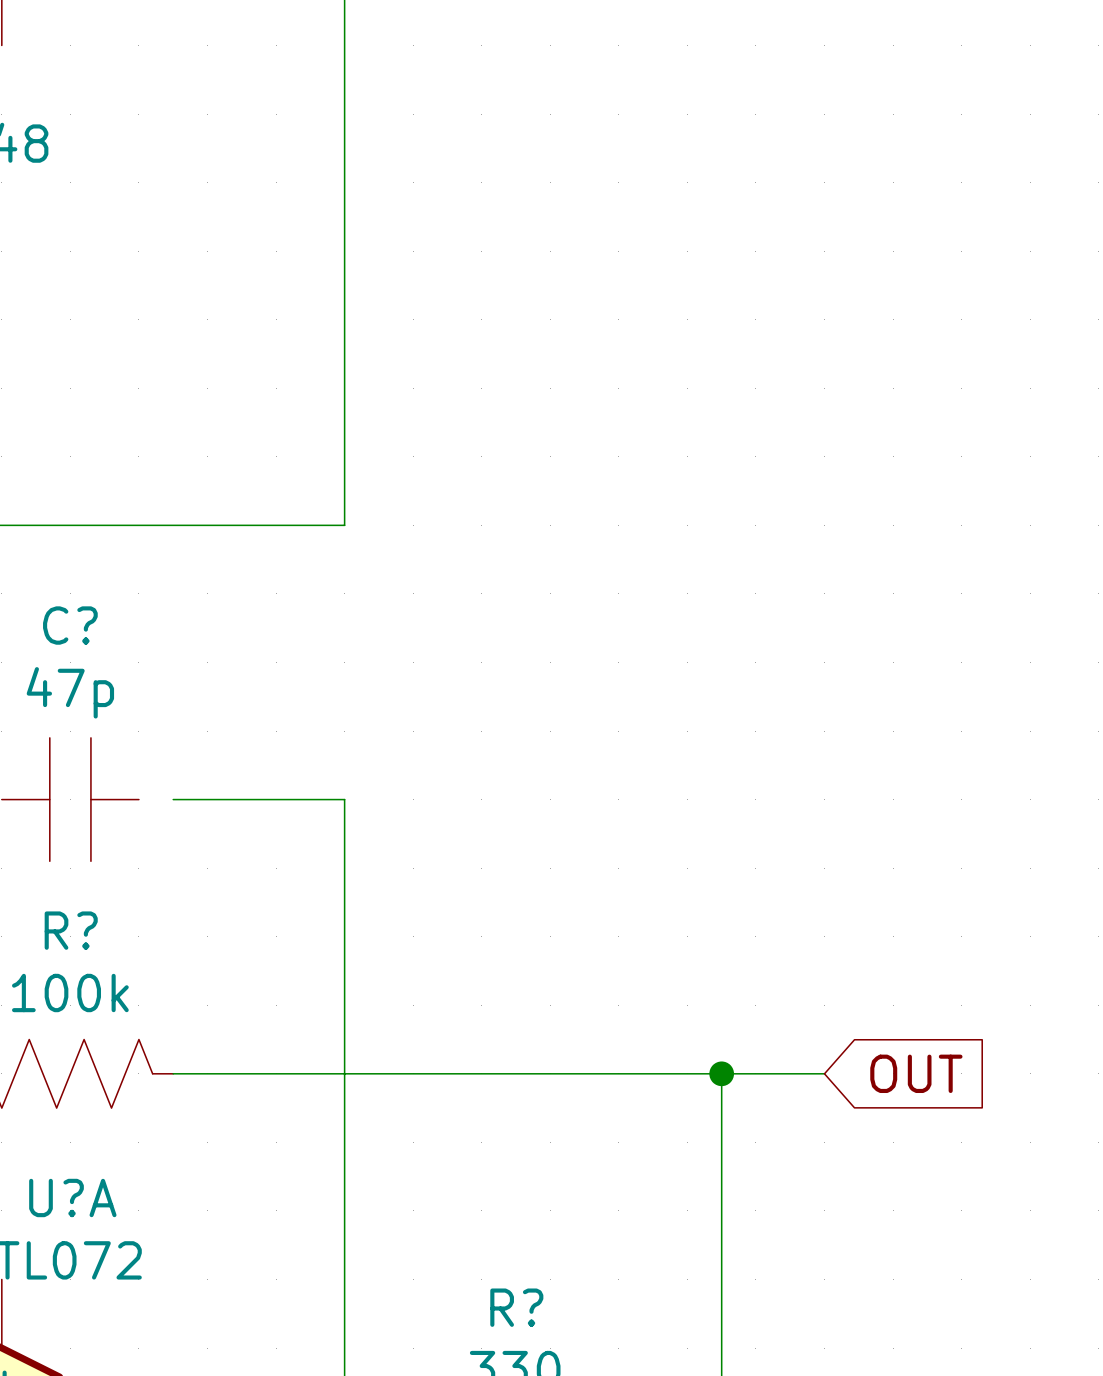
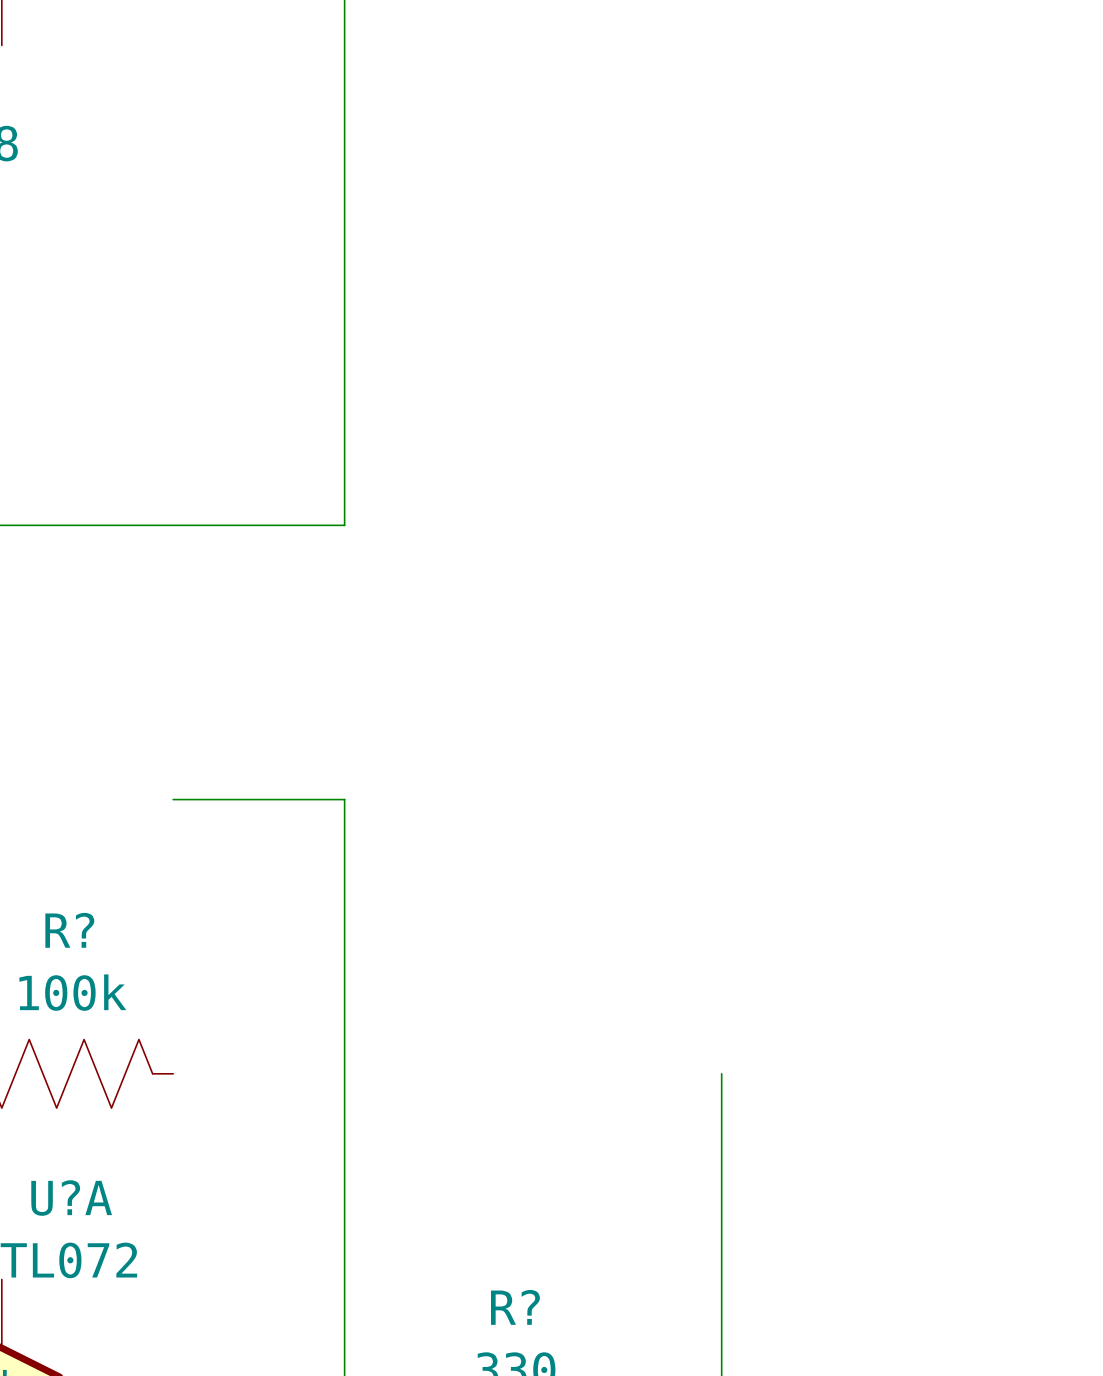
C?: 47p (70, 799) -> none
wire: (173, 1073) (824, 1073) -> none
junction: (721, 1073) -> none
global label: OUT (916, 1073) -> none

